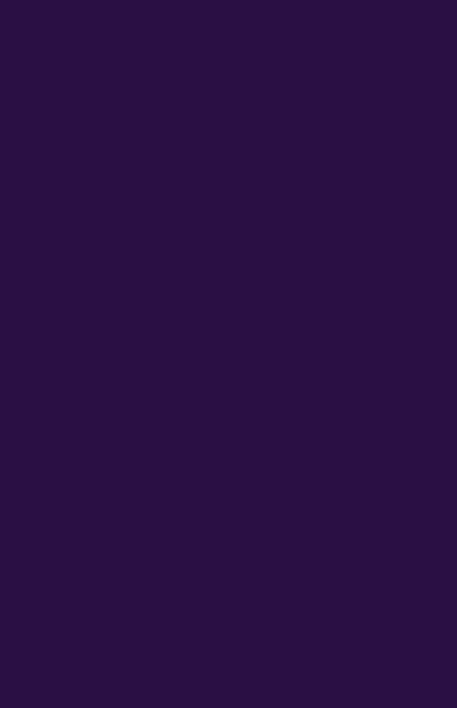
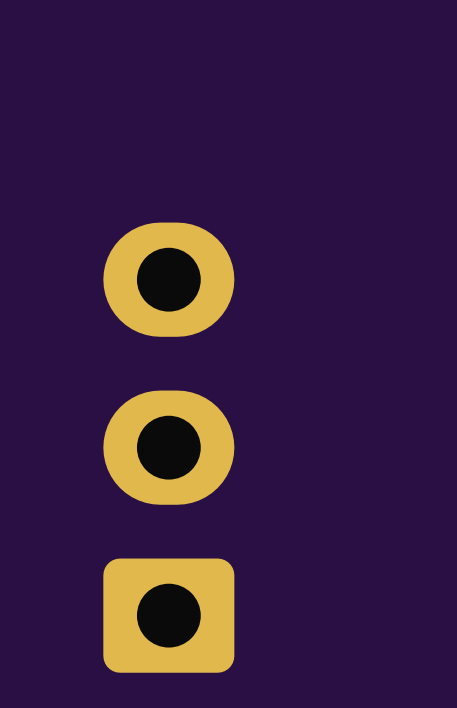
part: none -> (168, 447)

